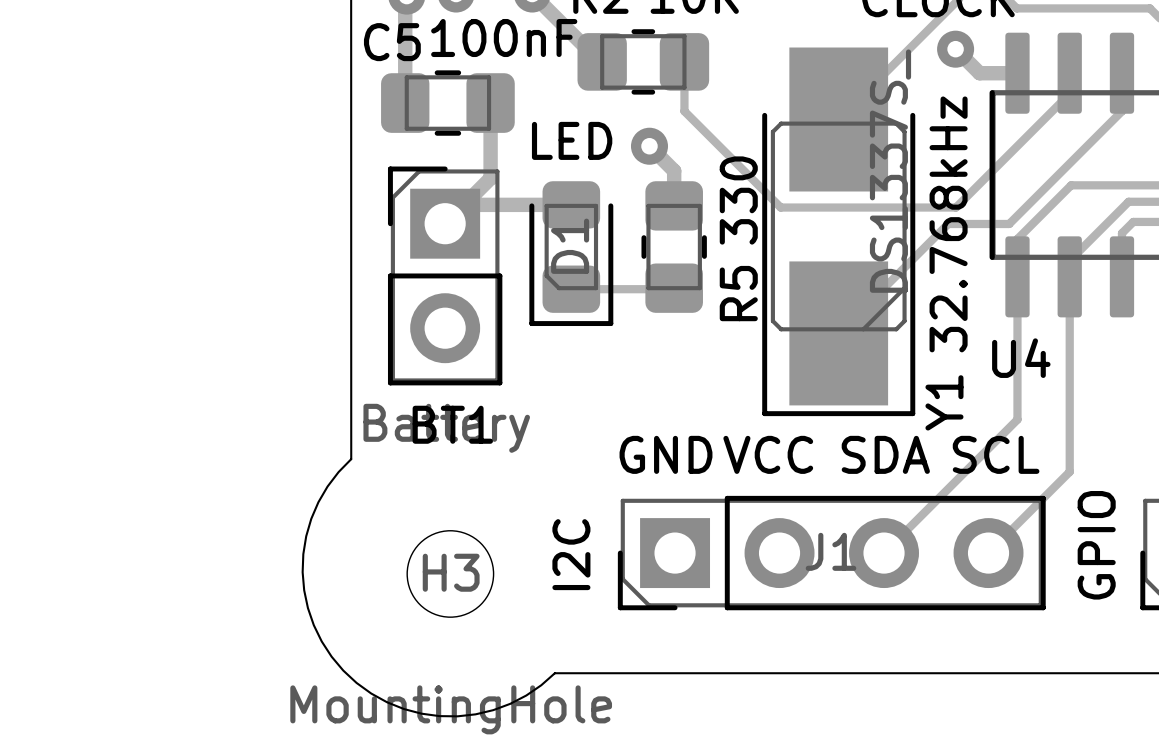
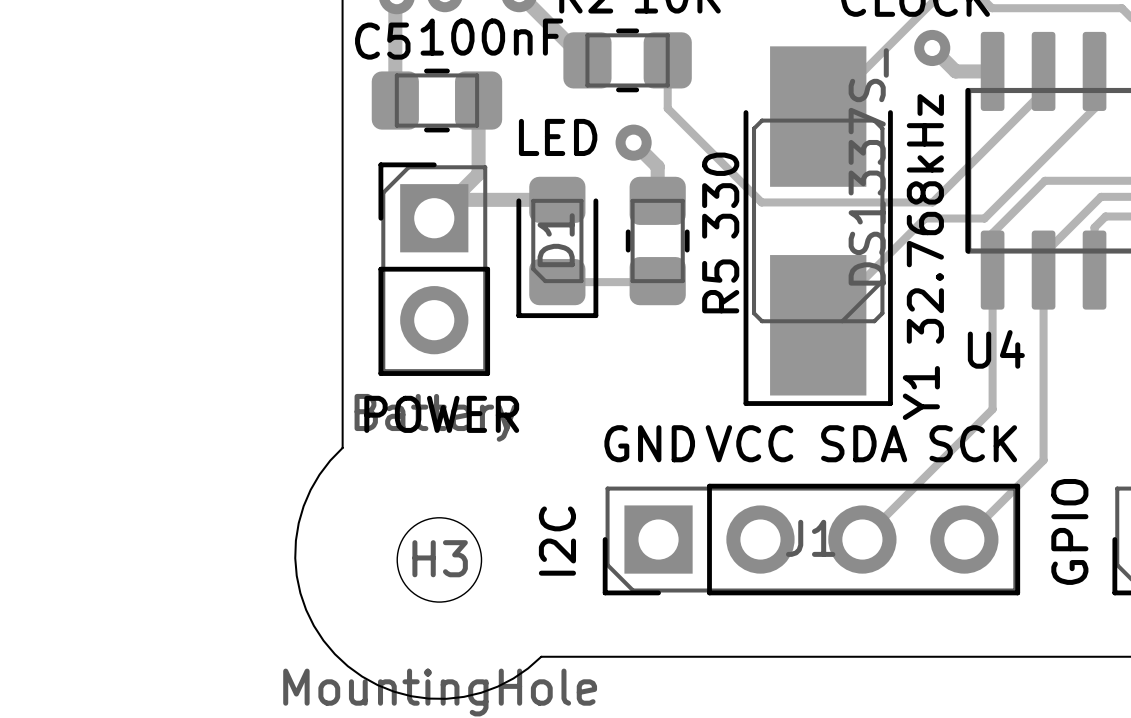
BT1 name: BT1 (452, 424) -> POWER (441, 414)
text: SCL (996, 454) -> SCK (973, 443)

